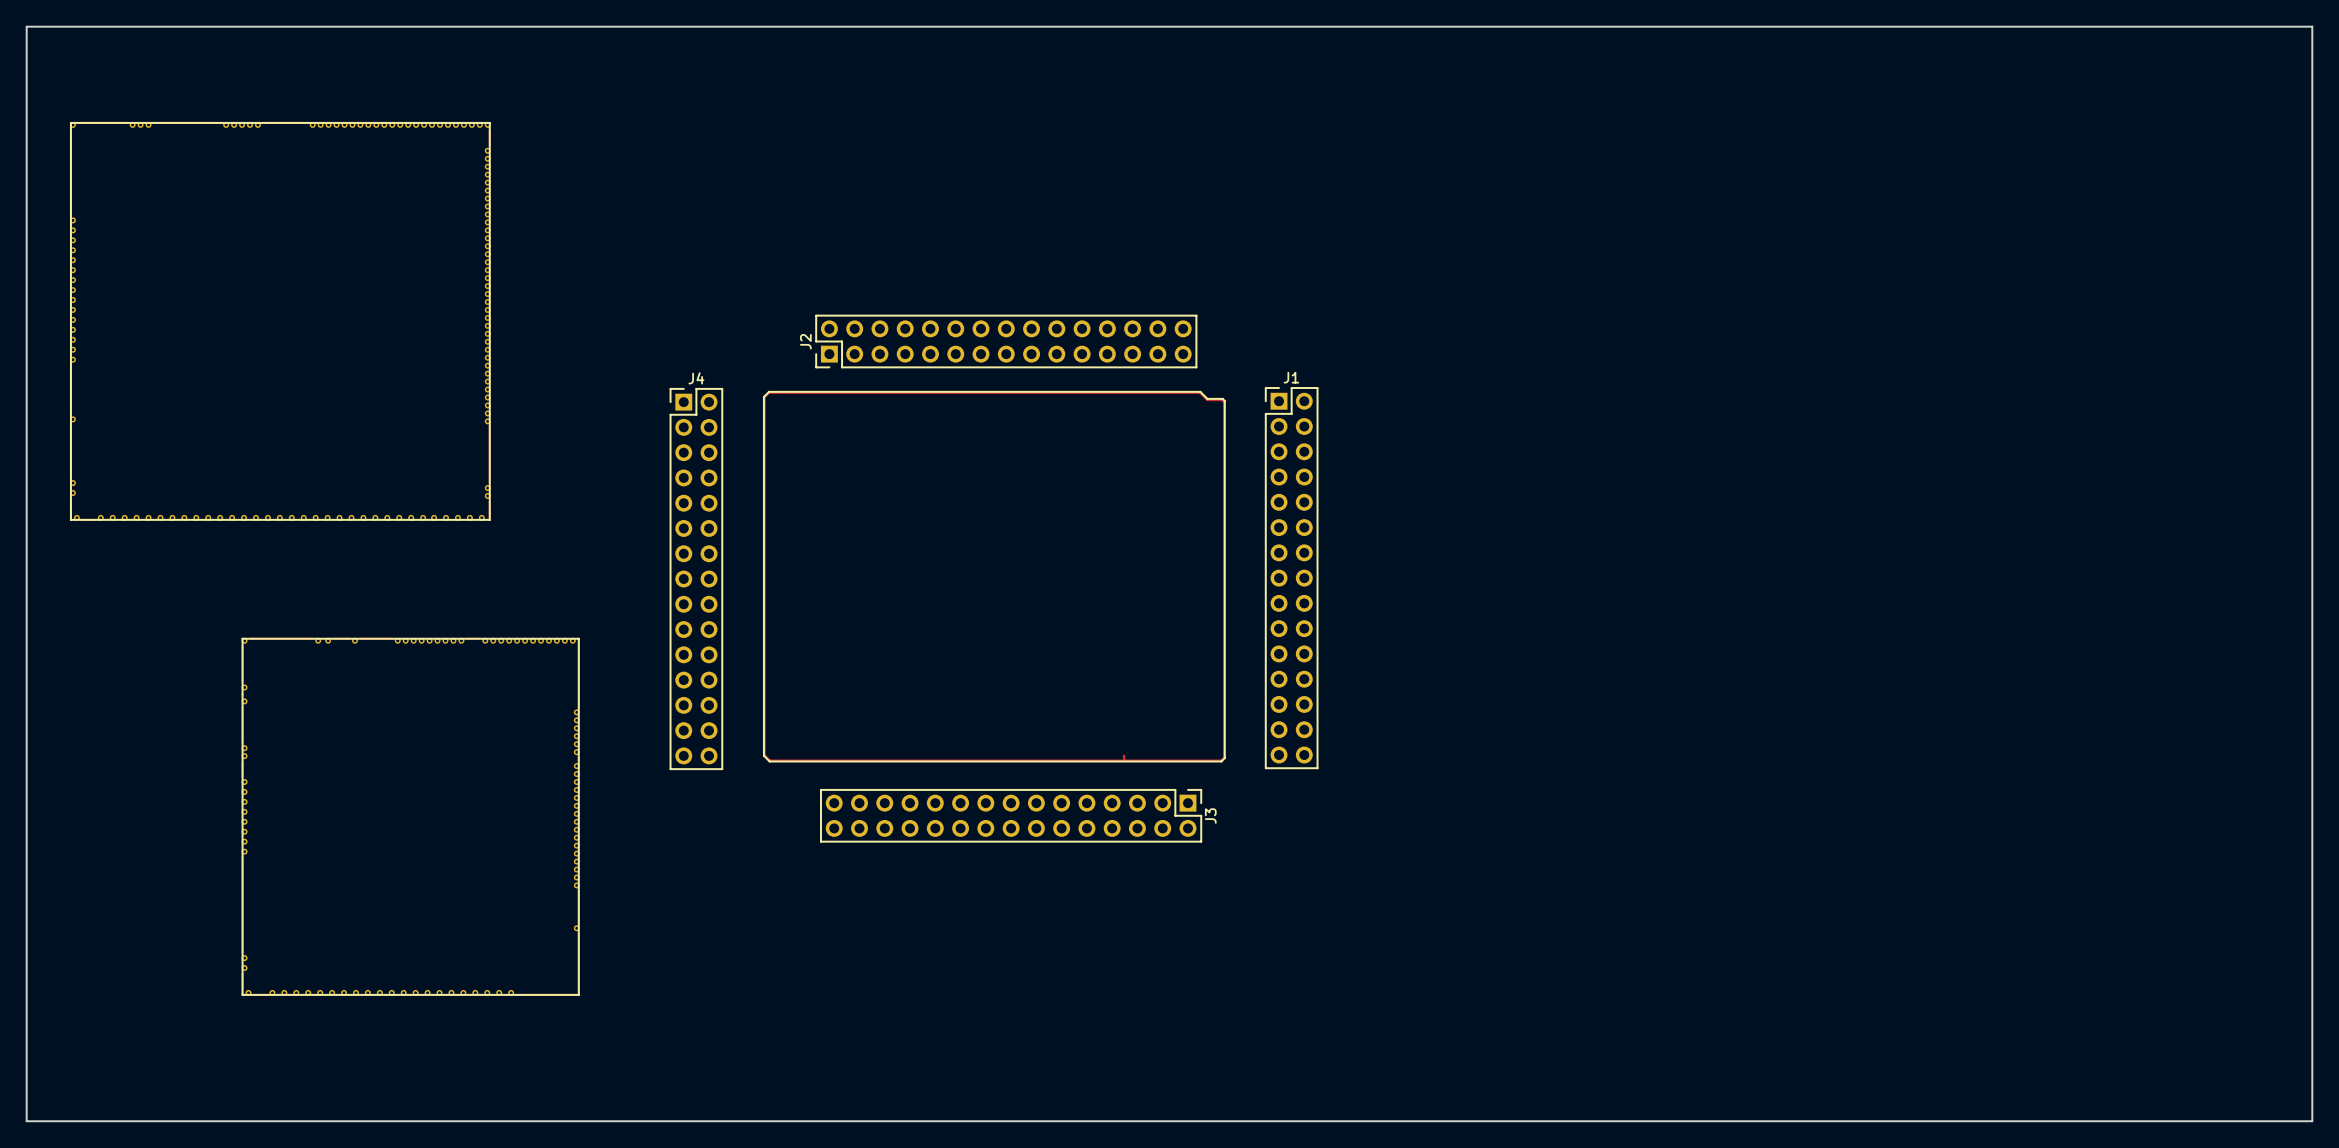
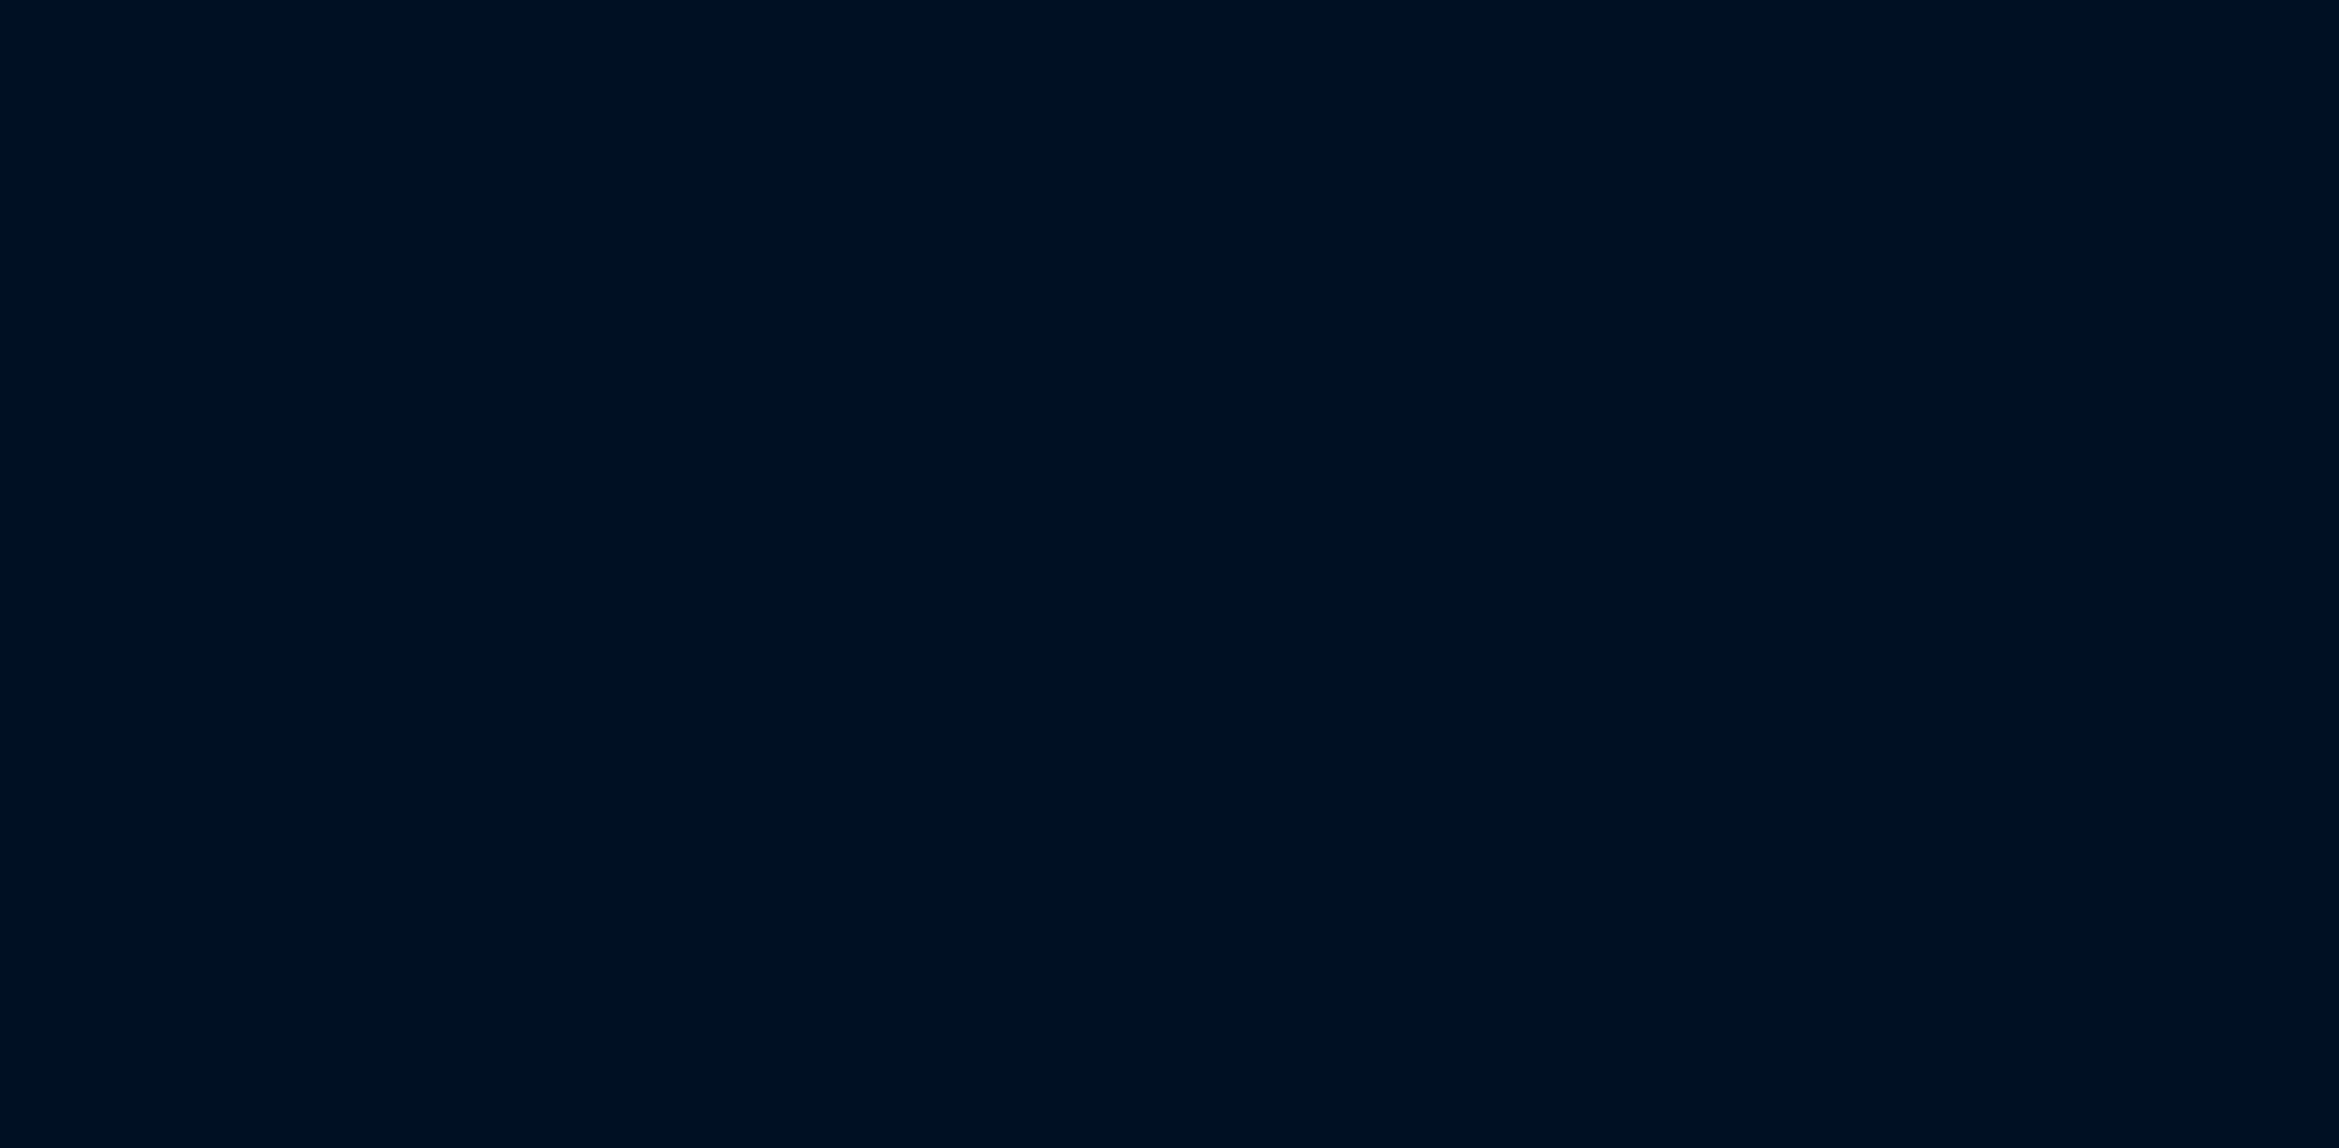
board edge: (26, 26) (2312, 26) (2312, 1121) (26, 1121) (26, 26) -> none
part: (280, 321) -> none
J2: (1006, 341) -> none
part: (994, 576) -> none
J1: (1291, 578) -> none
J4: (696, 579) -> none
J3: (1011, 815) -> none
part: (410, 816) -> none

